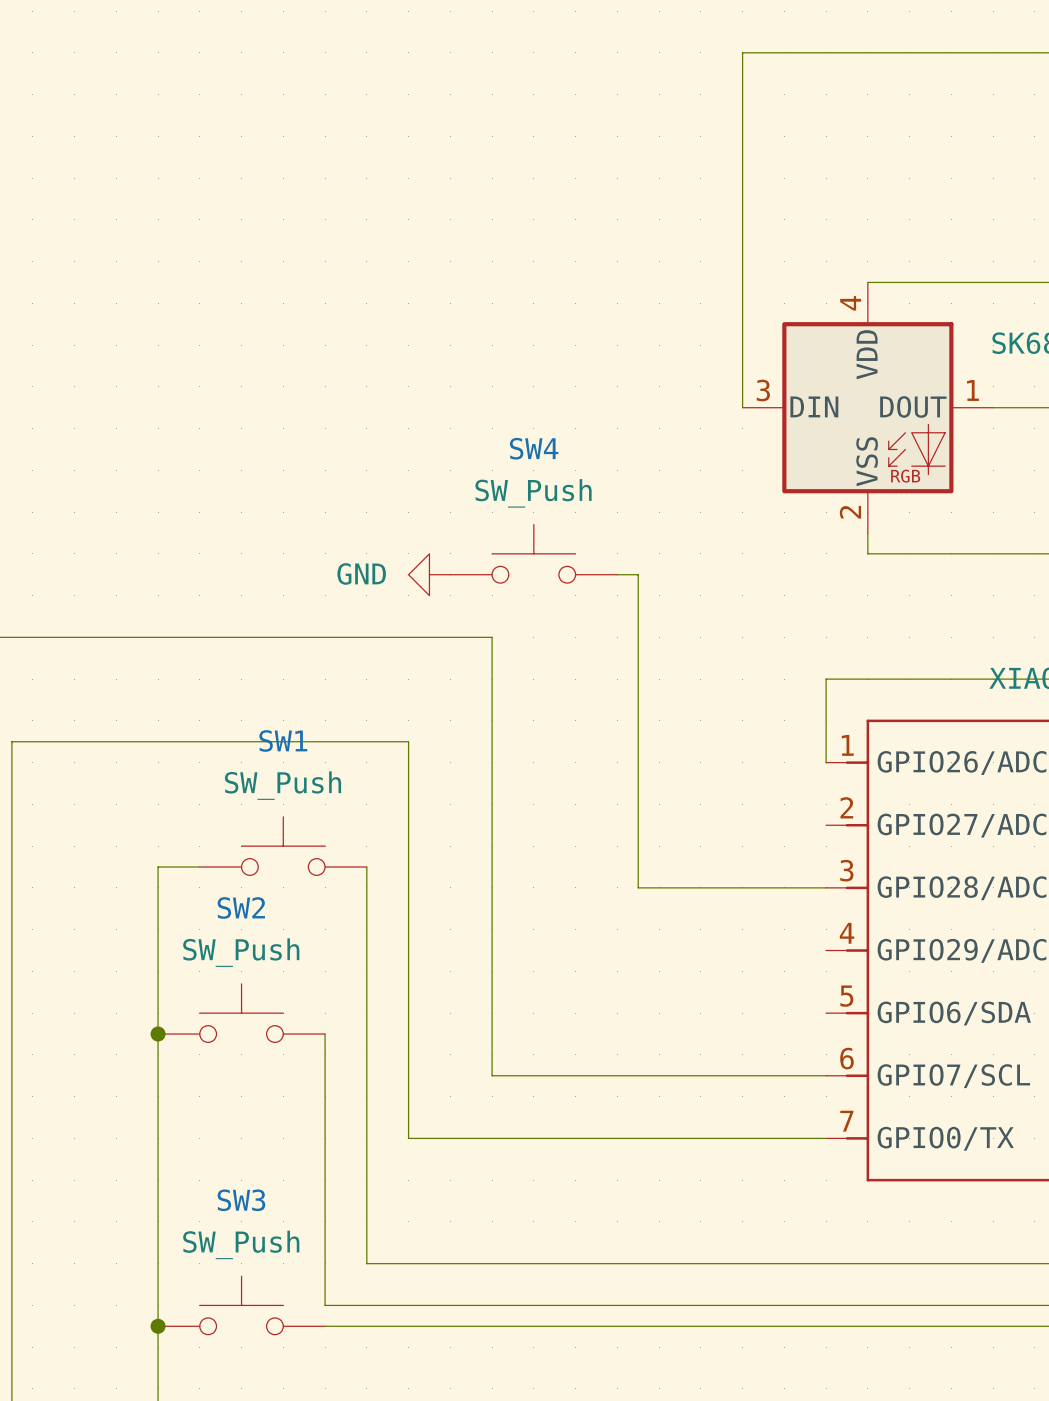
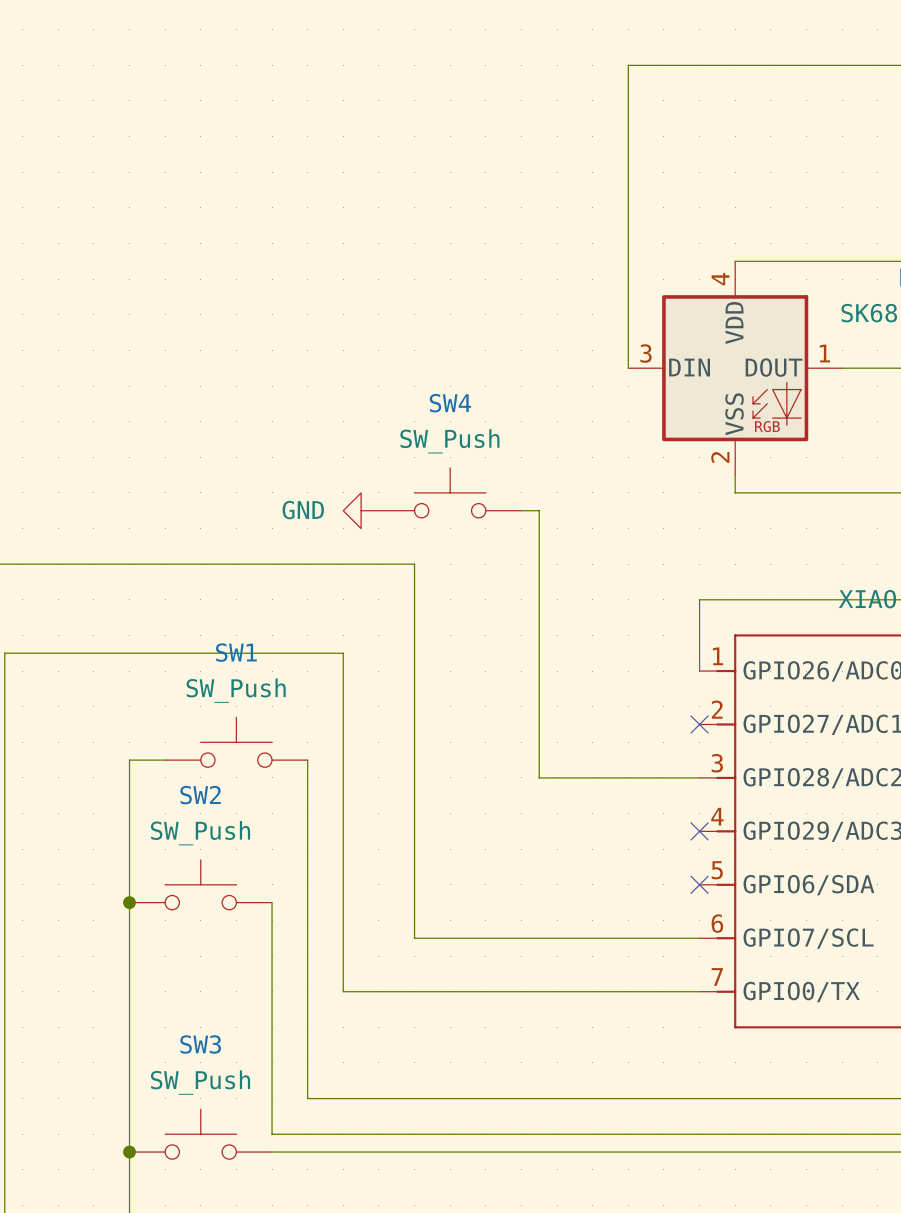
no-connect mark: none -> (699, 724)
no-connect mark: none -> (699, 831)
no-connect mark: none -> (699, 884)

